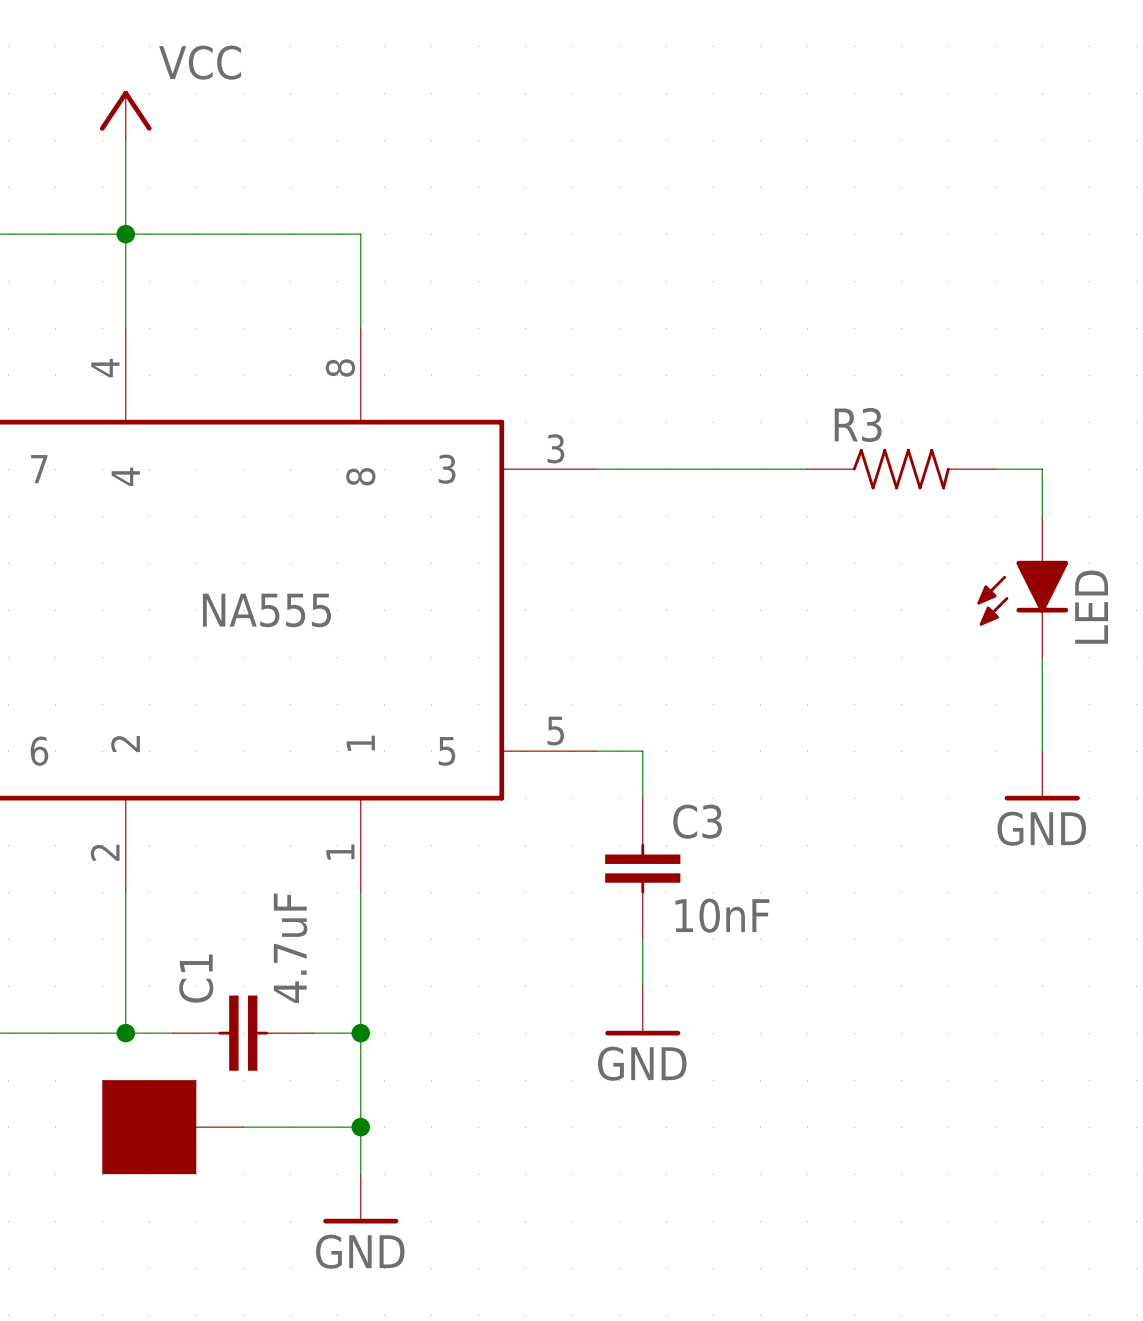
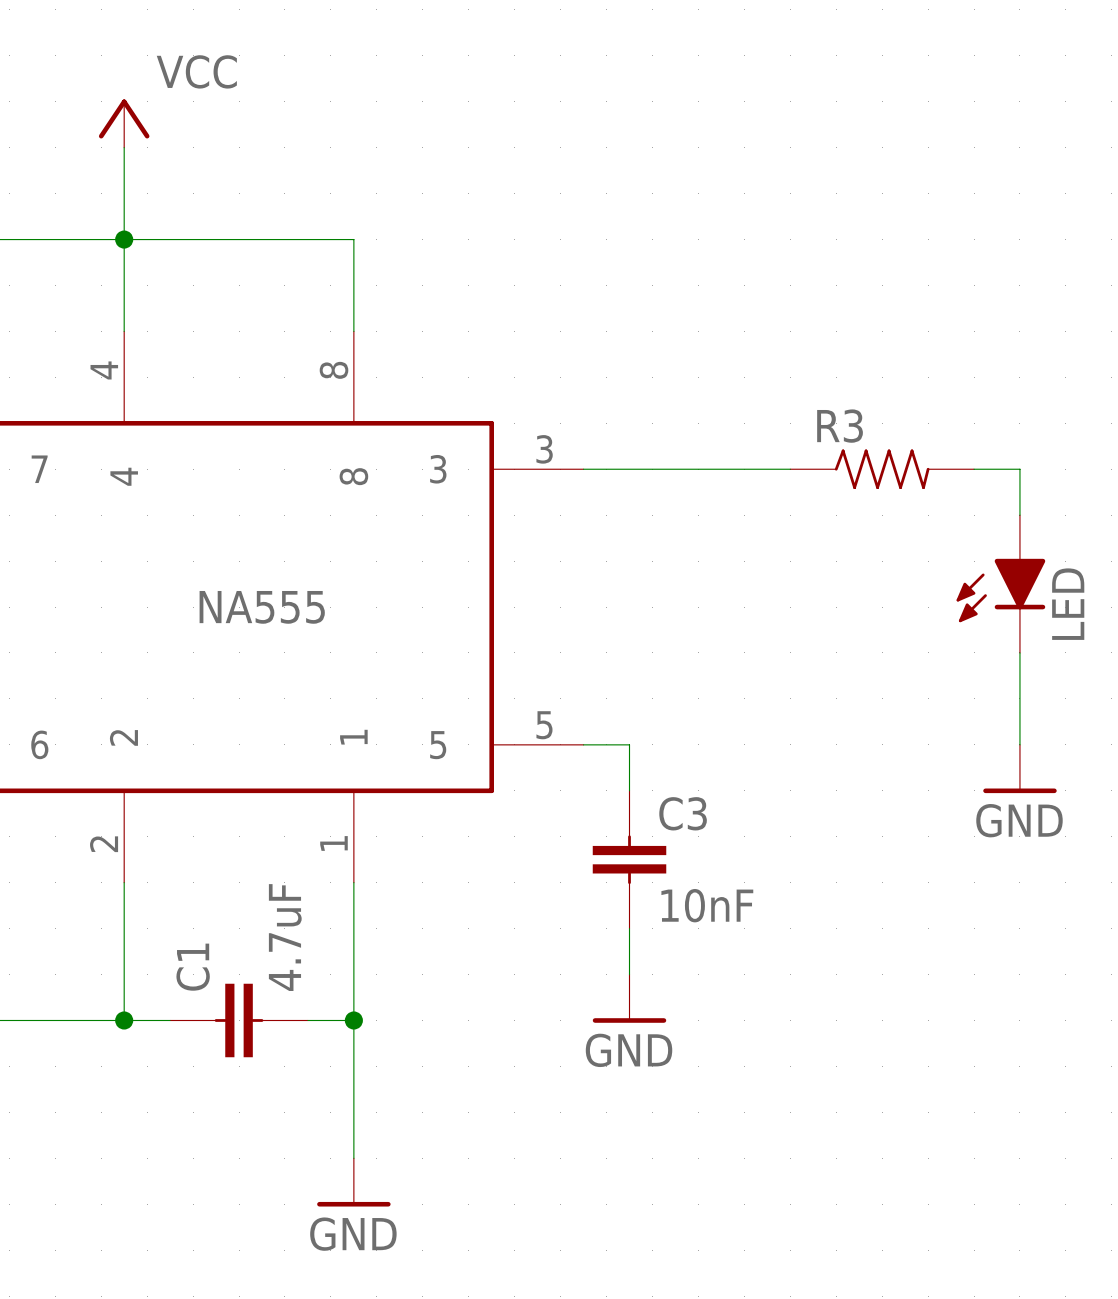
part: (172, 1127) -> none
wire: (243, 1127) (360, 1127) -> none
junction: (360, 1127) -> none

